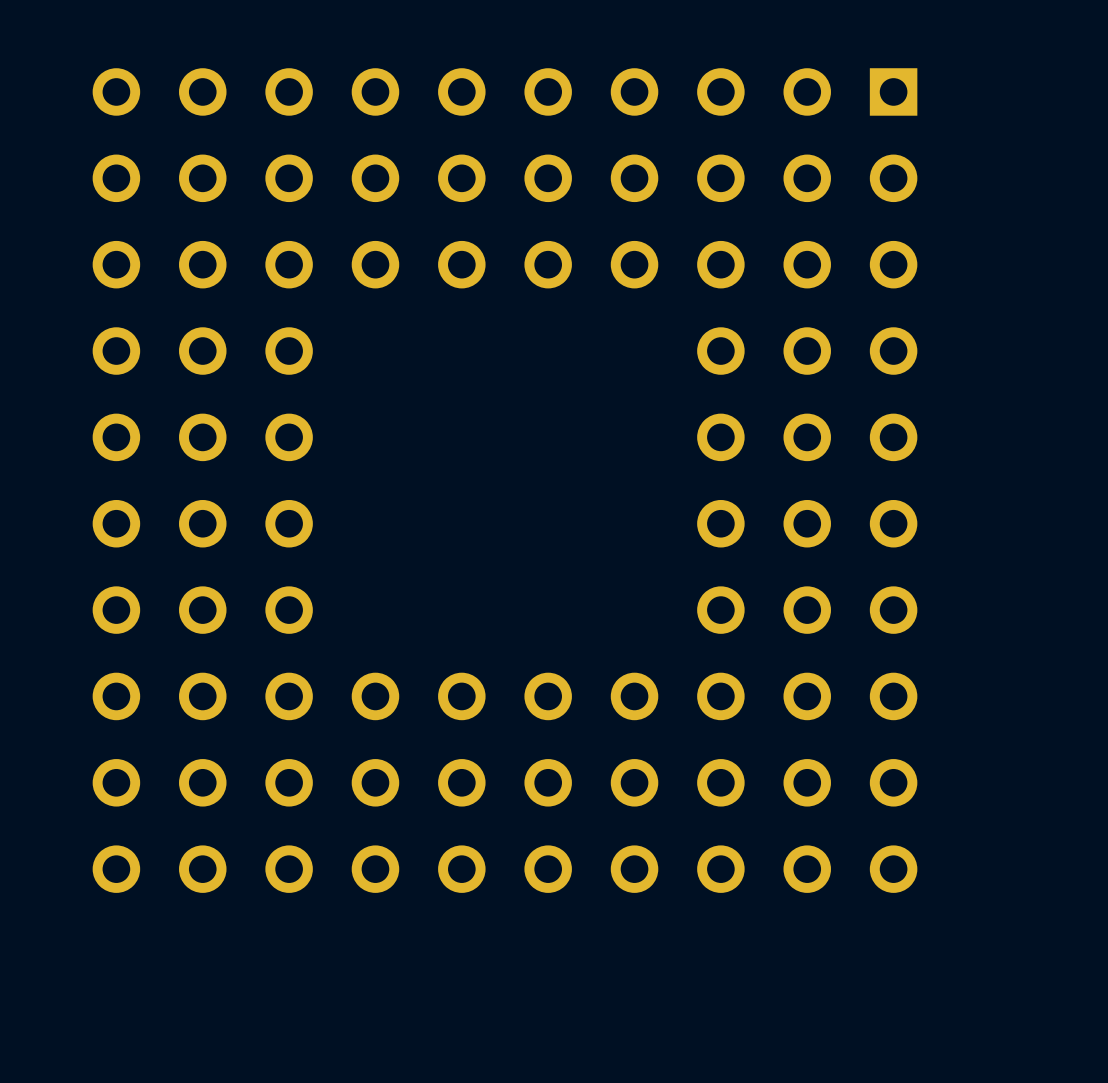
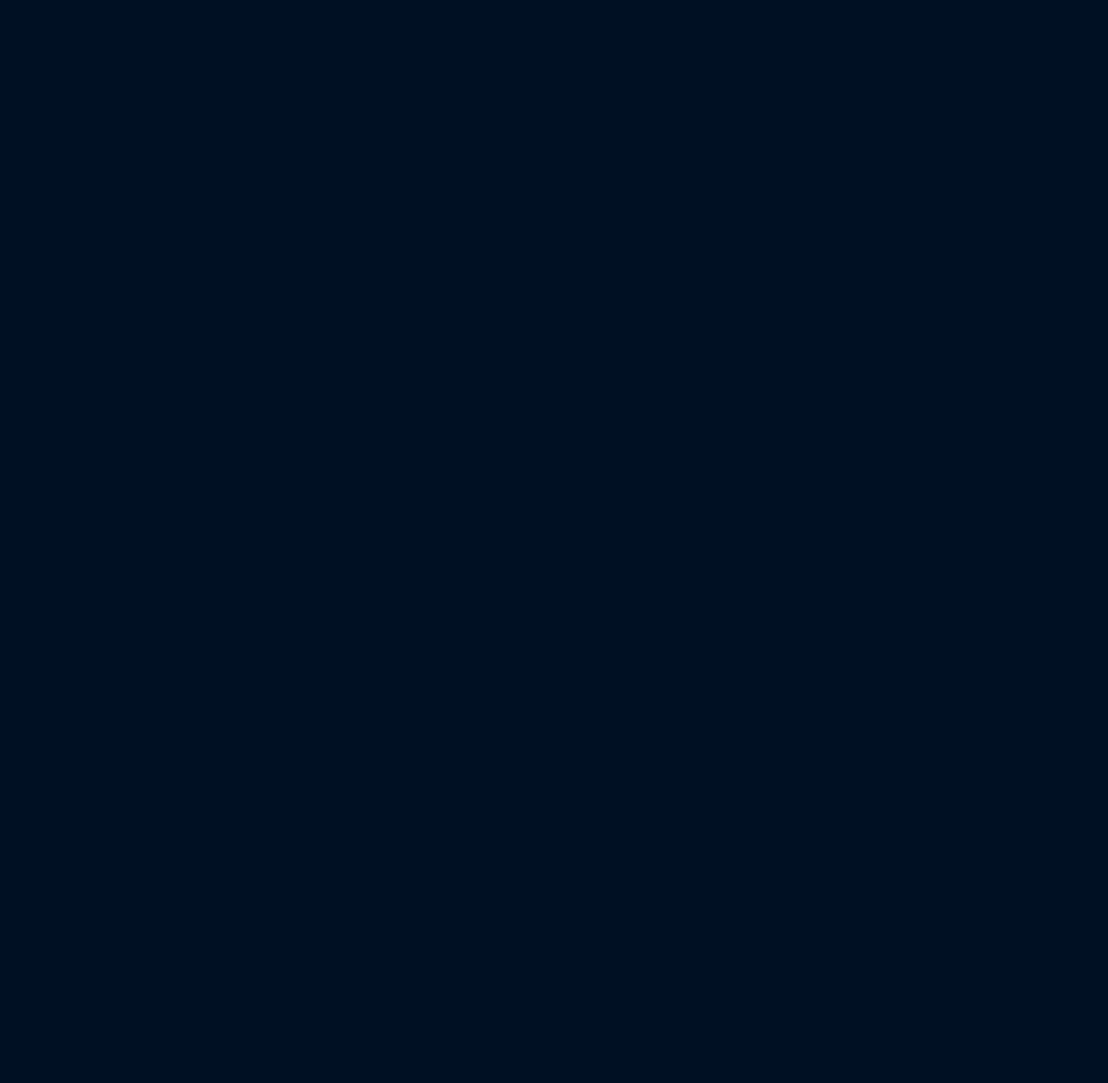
part: (505, 480) -> none

